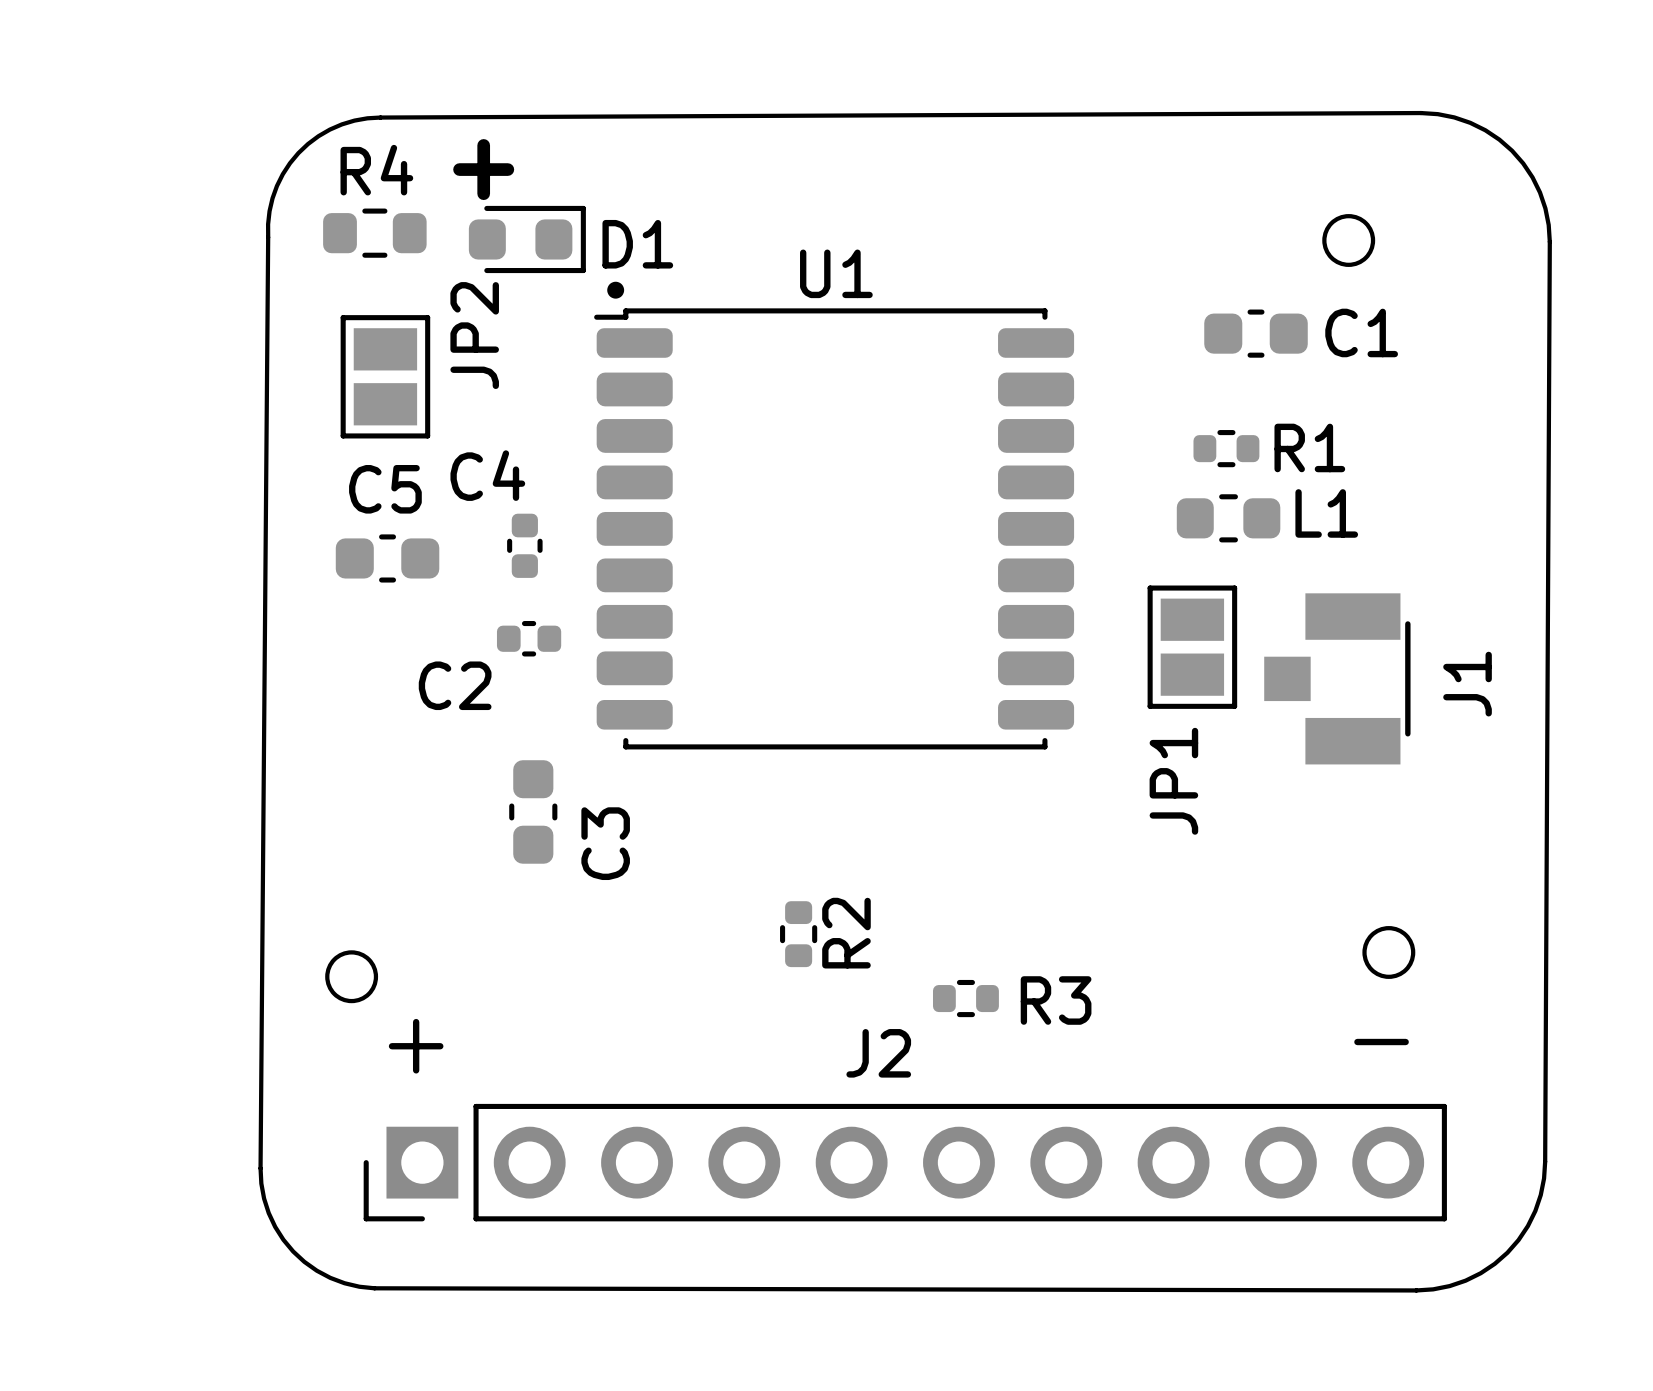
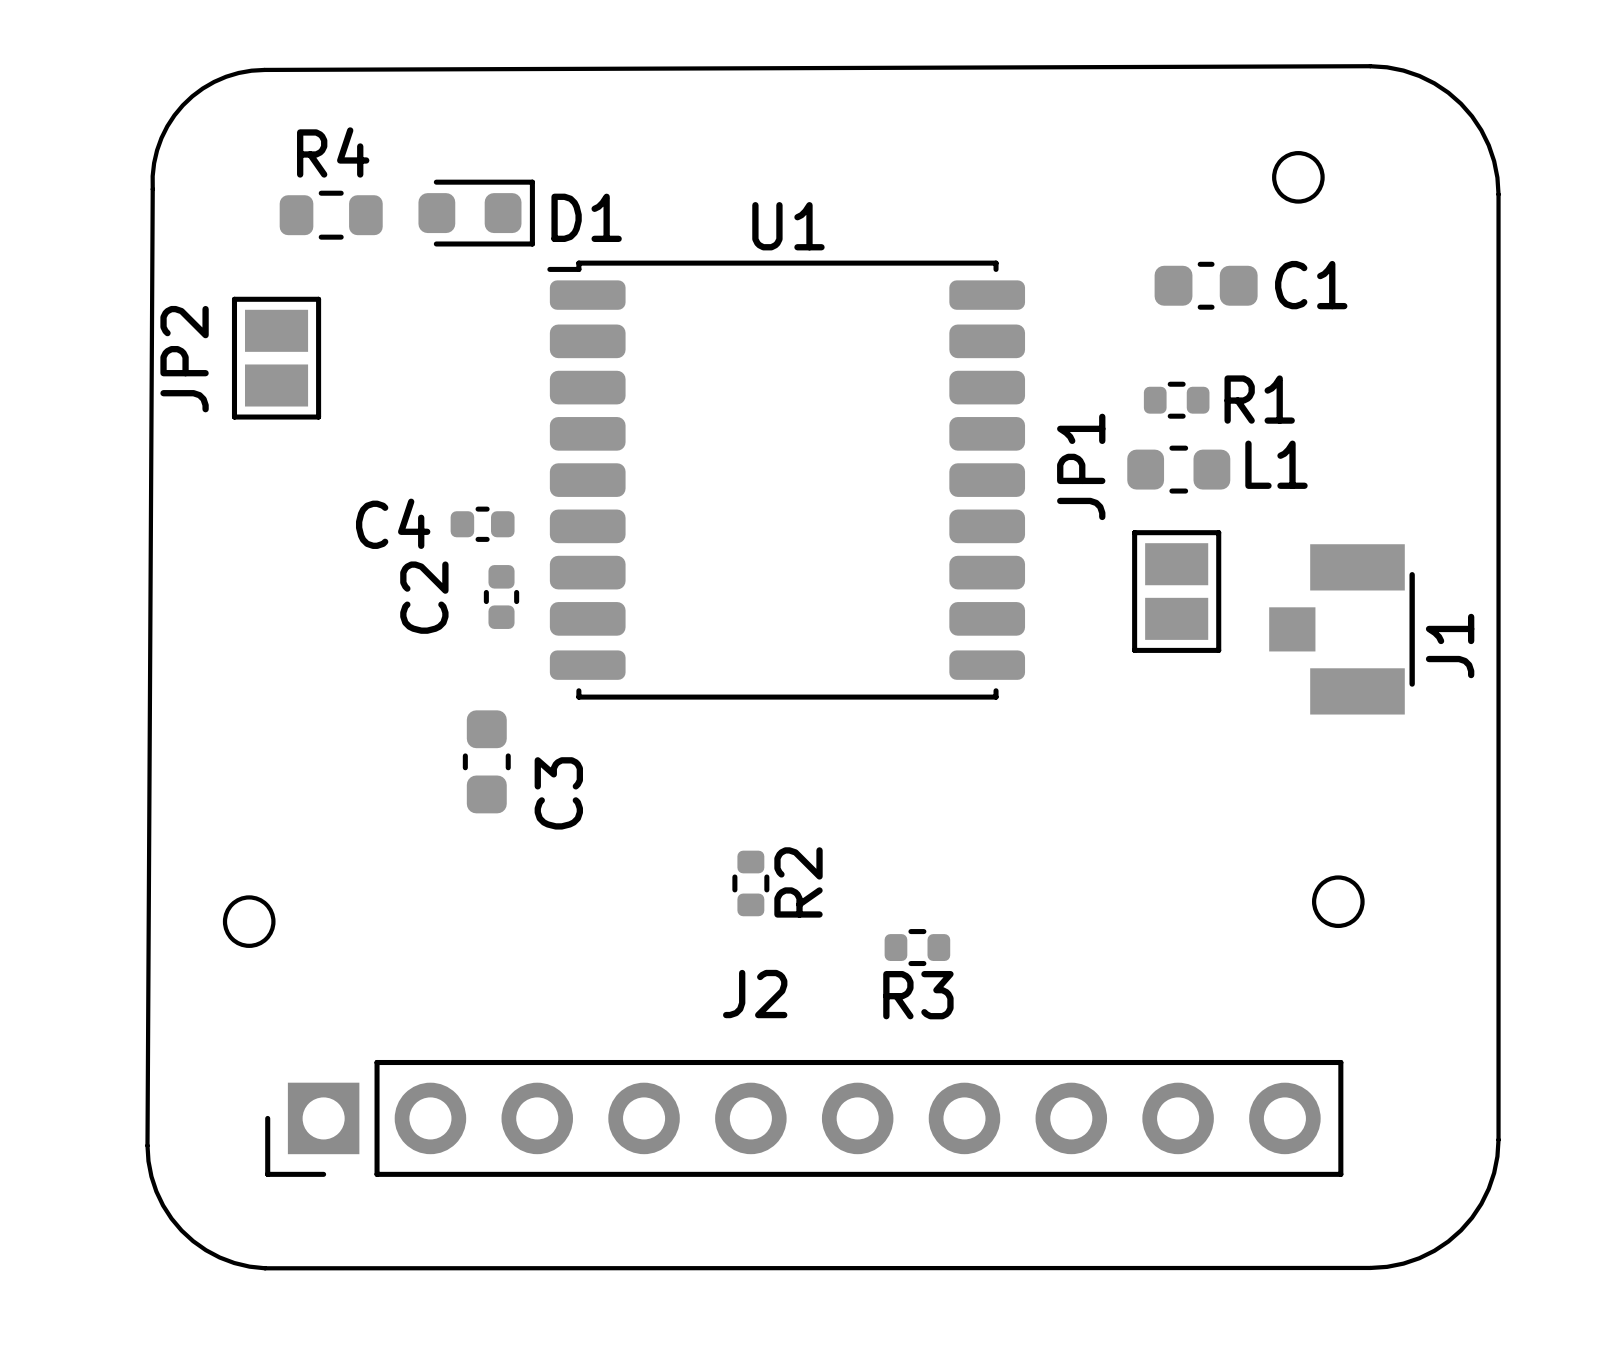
board edge: (1421, 113) (380, 117) (367, 118) (341, 124) (318, 136) (298, 153) (290, 163) (276, 185) (269, 211) (268, 224) (260, 1168) (264, 1198) (268, 1213) (283, 1239) (293, 1251) (304, 1261) (330, 1277) (359, 1286) (374, 1288) (1416, 1290) (1449, 1286) (1465, 1280) (1494, 1263) (1518, 1240) (1535, 1210) (1540, 1195) (1545, 1161) (1549, 241) -> (1370, 66) (264, 69) (238, 72) (214, 81) (202, 88) (182, 105) (167, 126) (161, 138) (157, 150) (152, 176) (147, 1145) (151, 1176) (156, 1191) (163, 1205) (181, 1230) (193, 1241) (219, 1257) (249, 1266) (265, 1268) (1370, 1267) (1403, 1263) (1419, 1258) (1448, 1241) (1460, 1230) (1481, 1203) (1494, 1172) (1498, 1139) (1498, 194)
text: + (483, 169) -> none
R4 position: (374, 233) -> (331, 215)
D1 position: (527, 239) -> (476, 213)
round board edge position: (1348, 240) -> (1298, 177)
drawing: [607, 281, 625, 299] -> none
JP2 name position: JP2 (474, 335) -> JP2 (184, 359)
JP2 position: (385, 376) -> (276, 358)
C4 name position: C4 (487, 475) -> C4 (393, 523)
C4 rotation: 0° (524, 545) -> 90° clockwise (482, 524)
C5: (387, 558) -> none
C2 rotation: 0° (529, 638) -> 90° clockwise (501, 597)
JP1 position: (1192, 647) -> (1176, 591)
J1 position: (1337, 678) -> (1342, 629)
J1 name position: J1 (1467, 684) -> J1 (1450, 646)
JP1 name position: JP1 (1173, 781) -> JP1 (1081, 466)
round board edge position: (351, 976) -> (249, 921)
R3 name position: R3 (1056, 1000) -> R3 (918, 995)
text: - (1381, 1042) -> none
text: + (416, 1046) -> none
J2 name position: J2 (878, 1053) -> J2 (755, 994)
J2 position: (905, 1162) -> (804, 1118)

